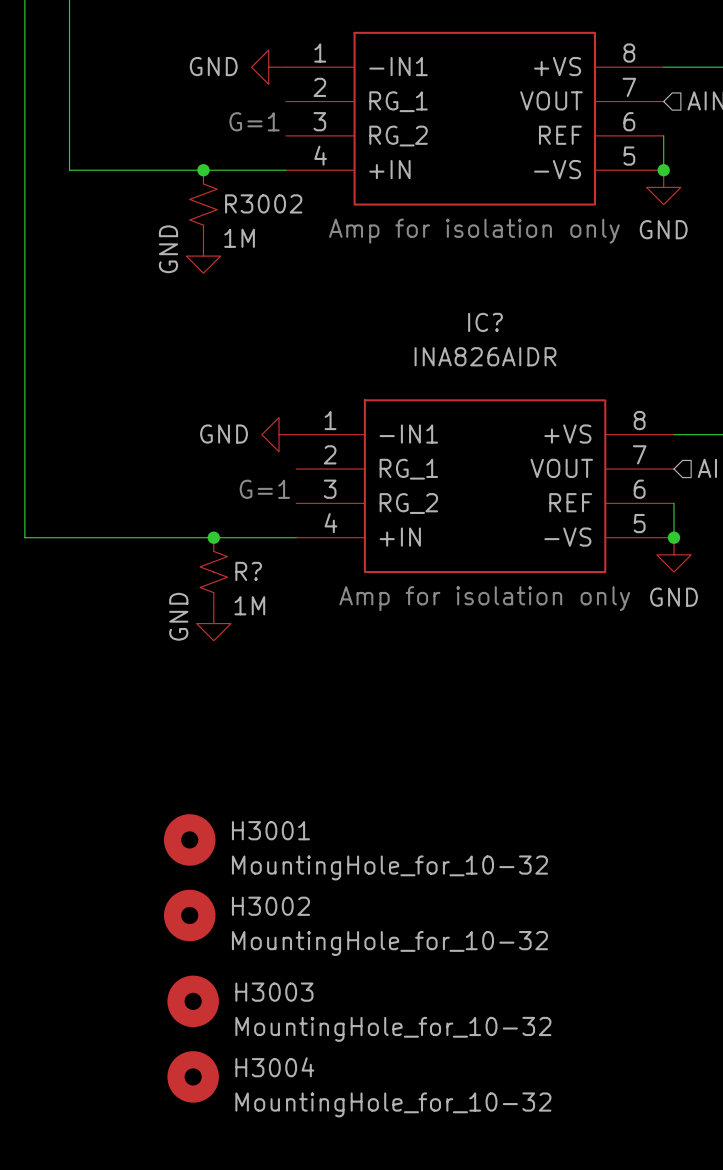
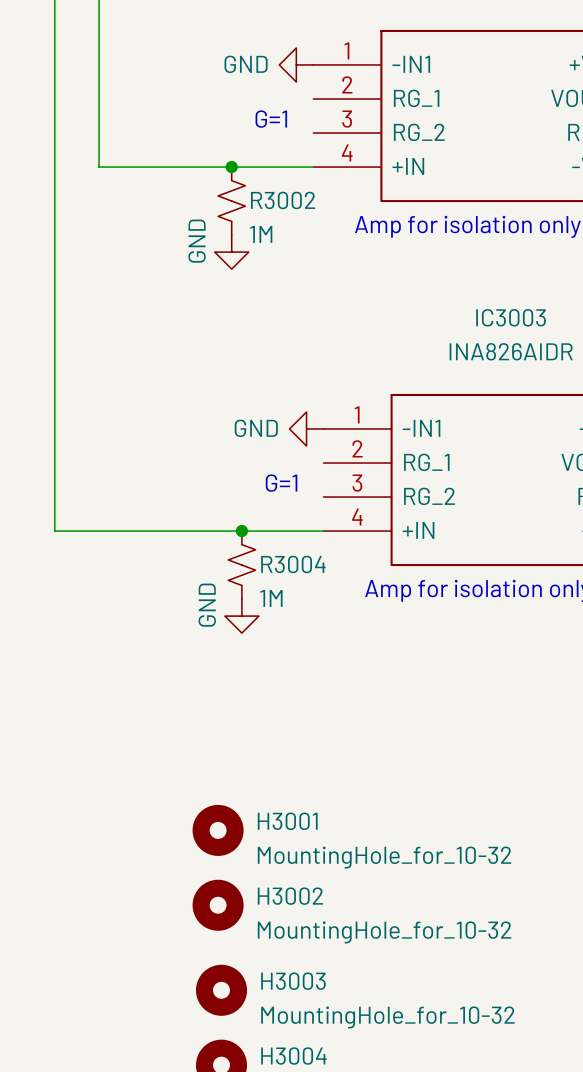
IC? name: IC? (485, 322) -> IC3003 (511, 317)
R? name: R? (248, 571) -> R3004 (293, 564)

